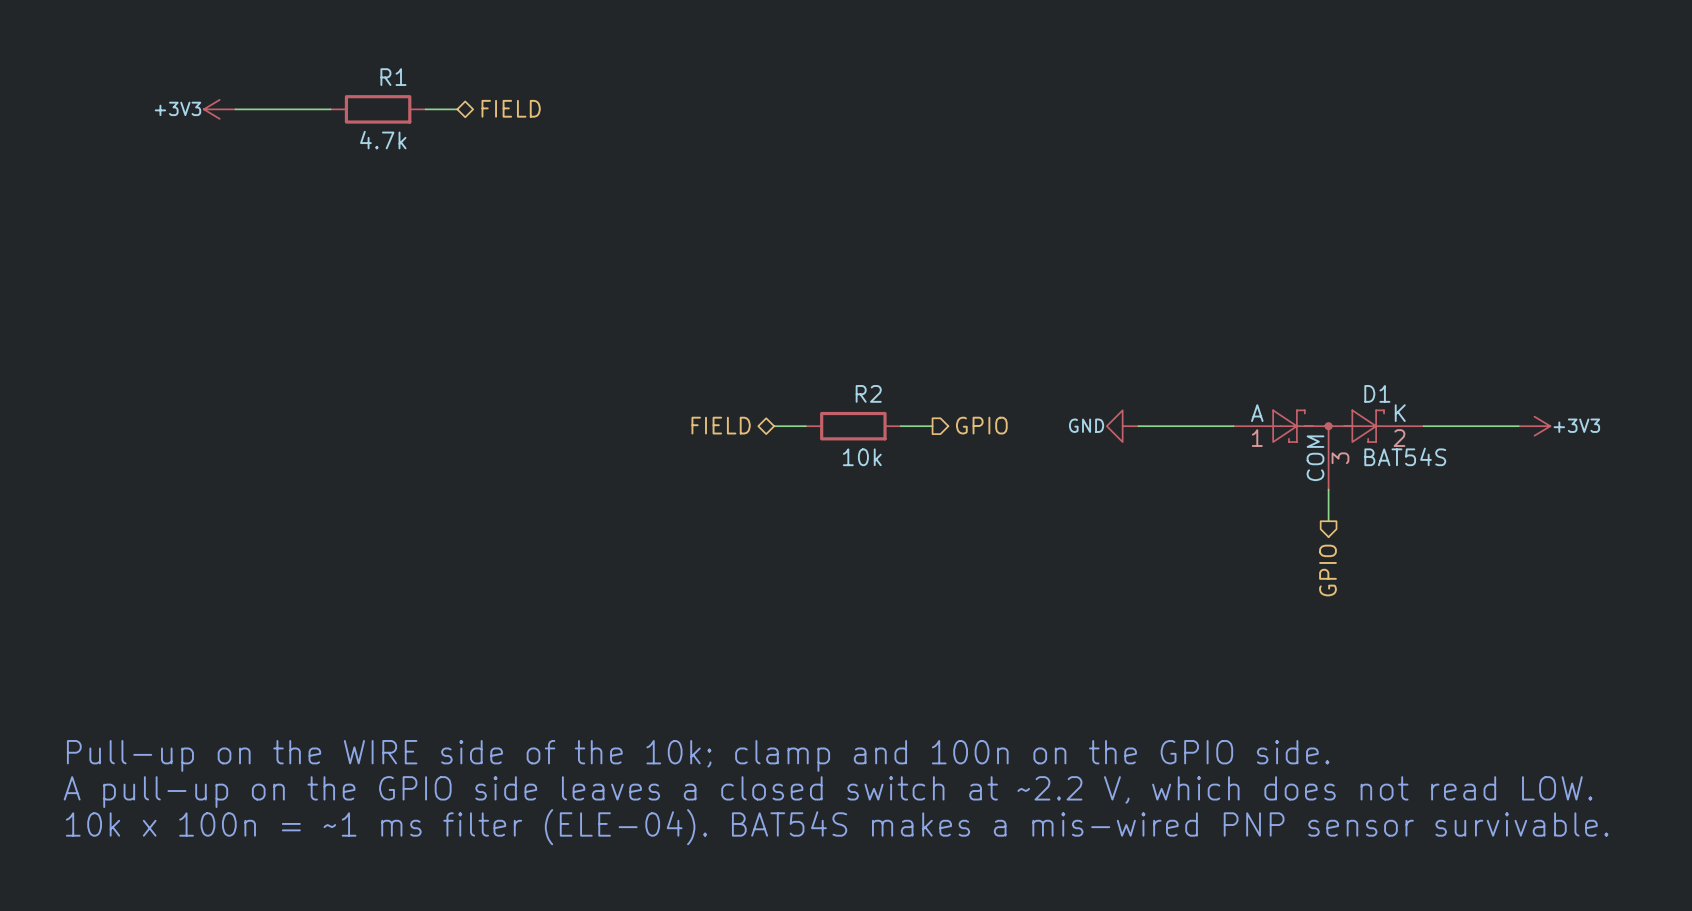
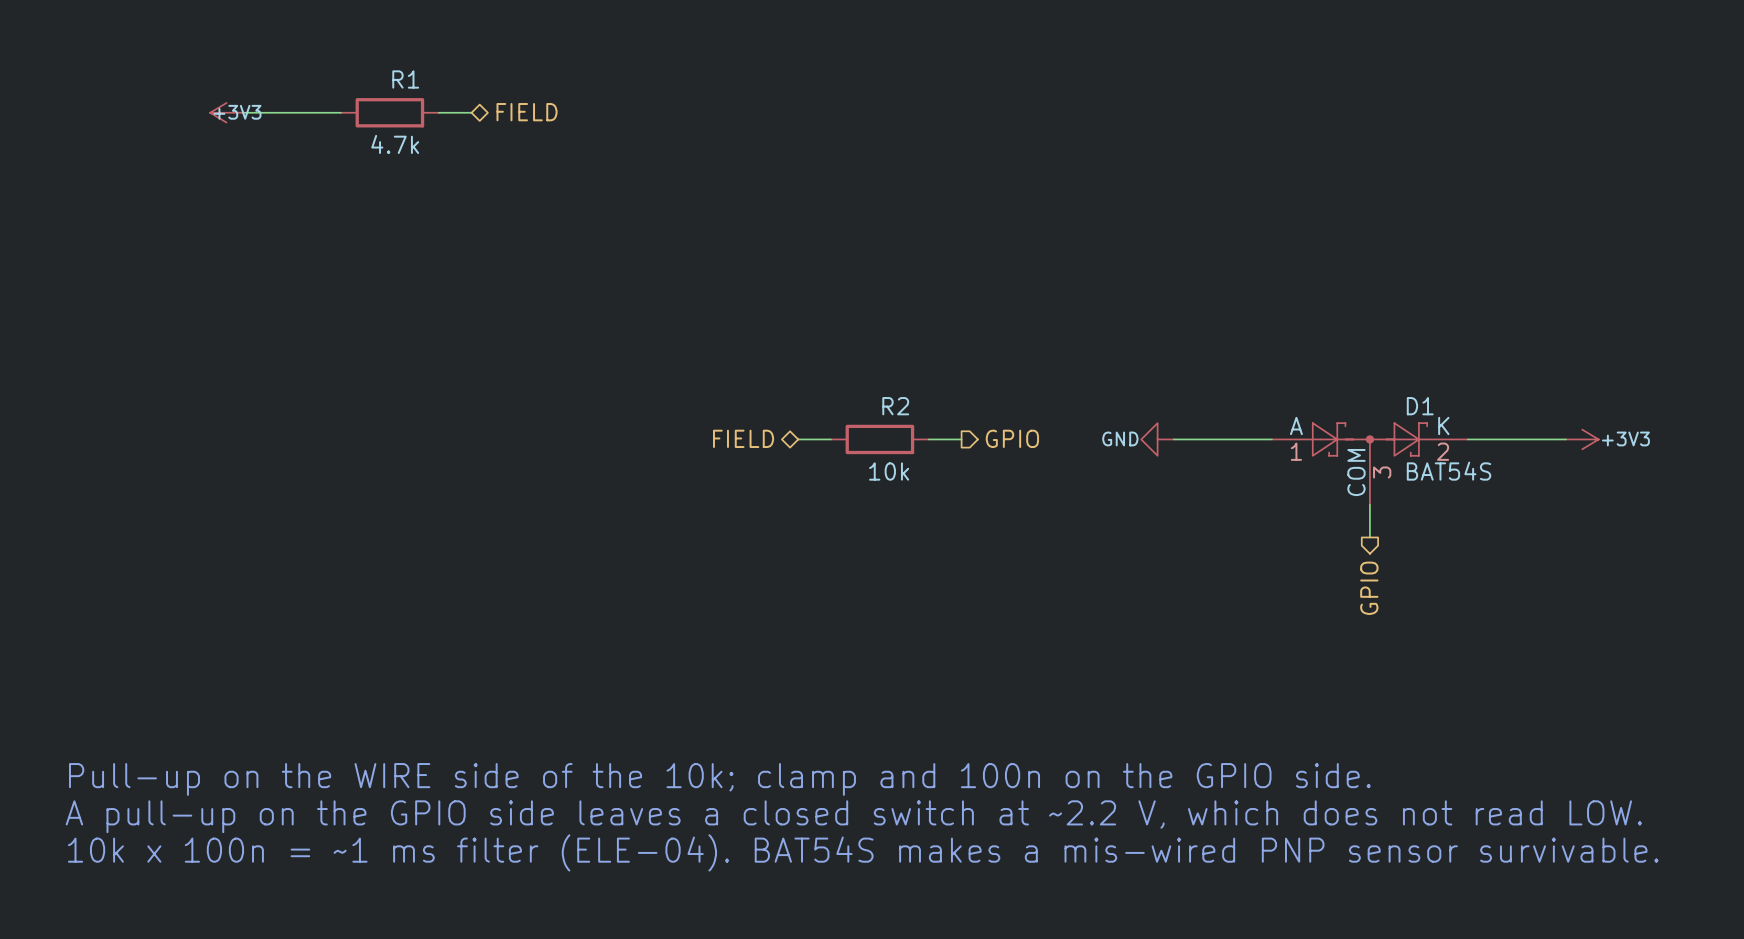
power symbol text position: +3V3 (177, 108) -> +3V3 (237, 112)

